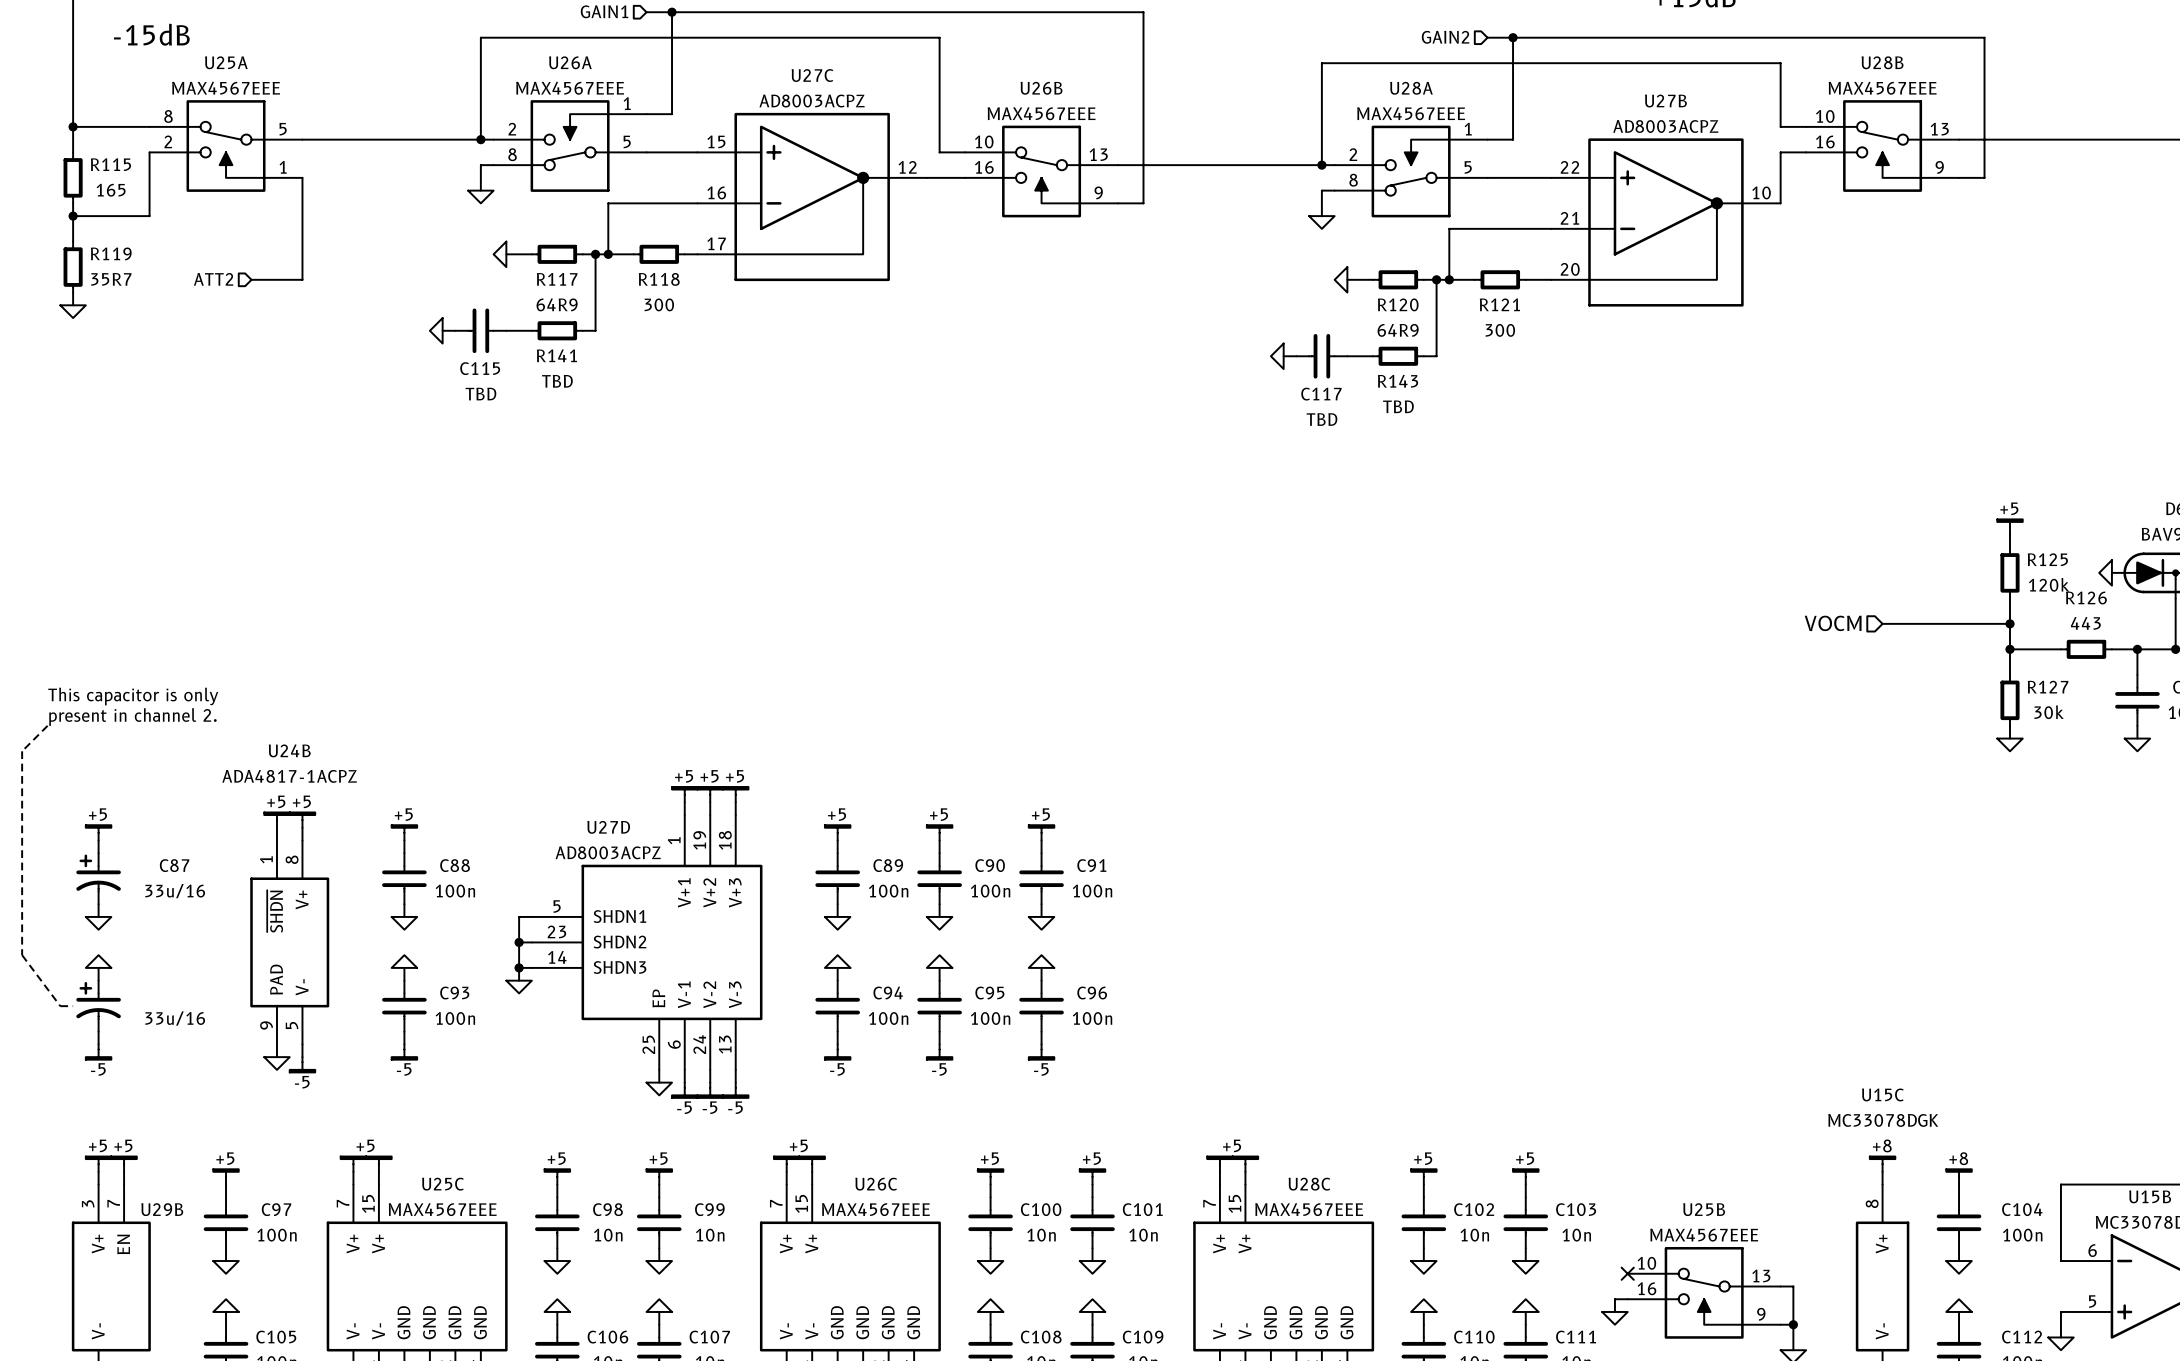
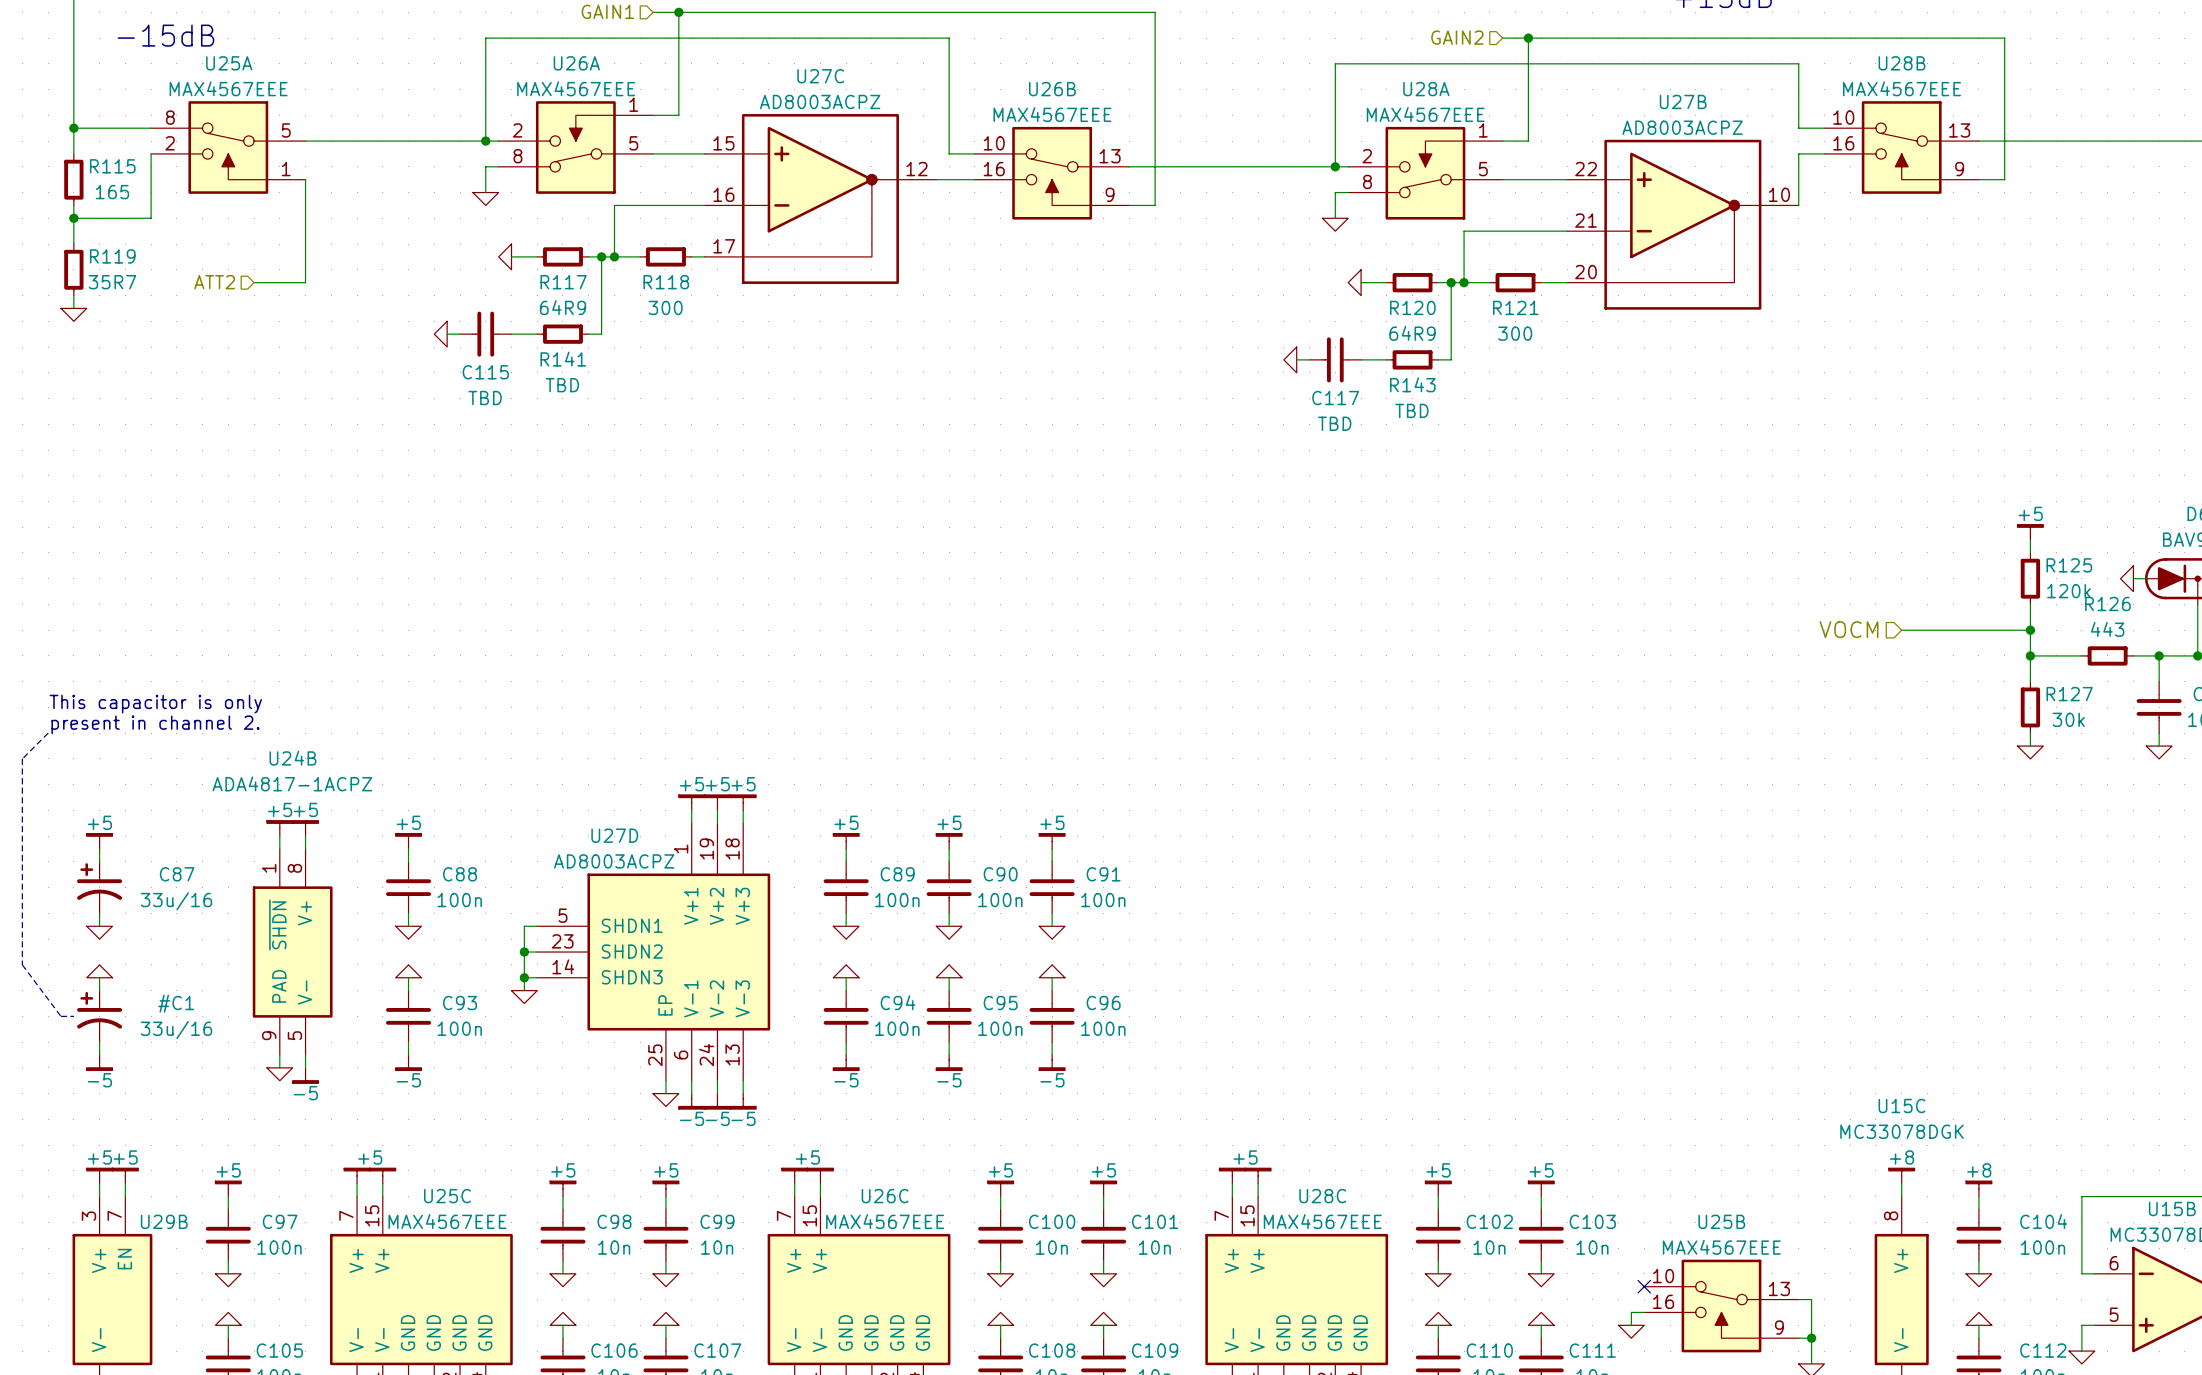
#C1 name: none -> #C1 (176, 1003)

